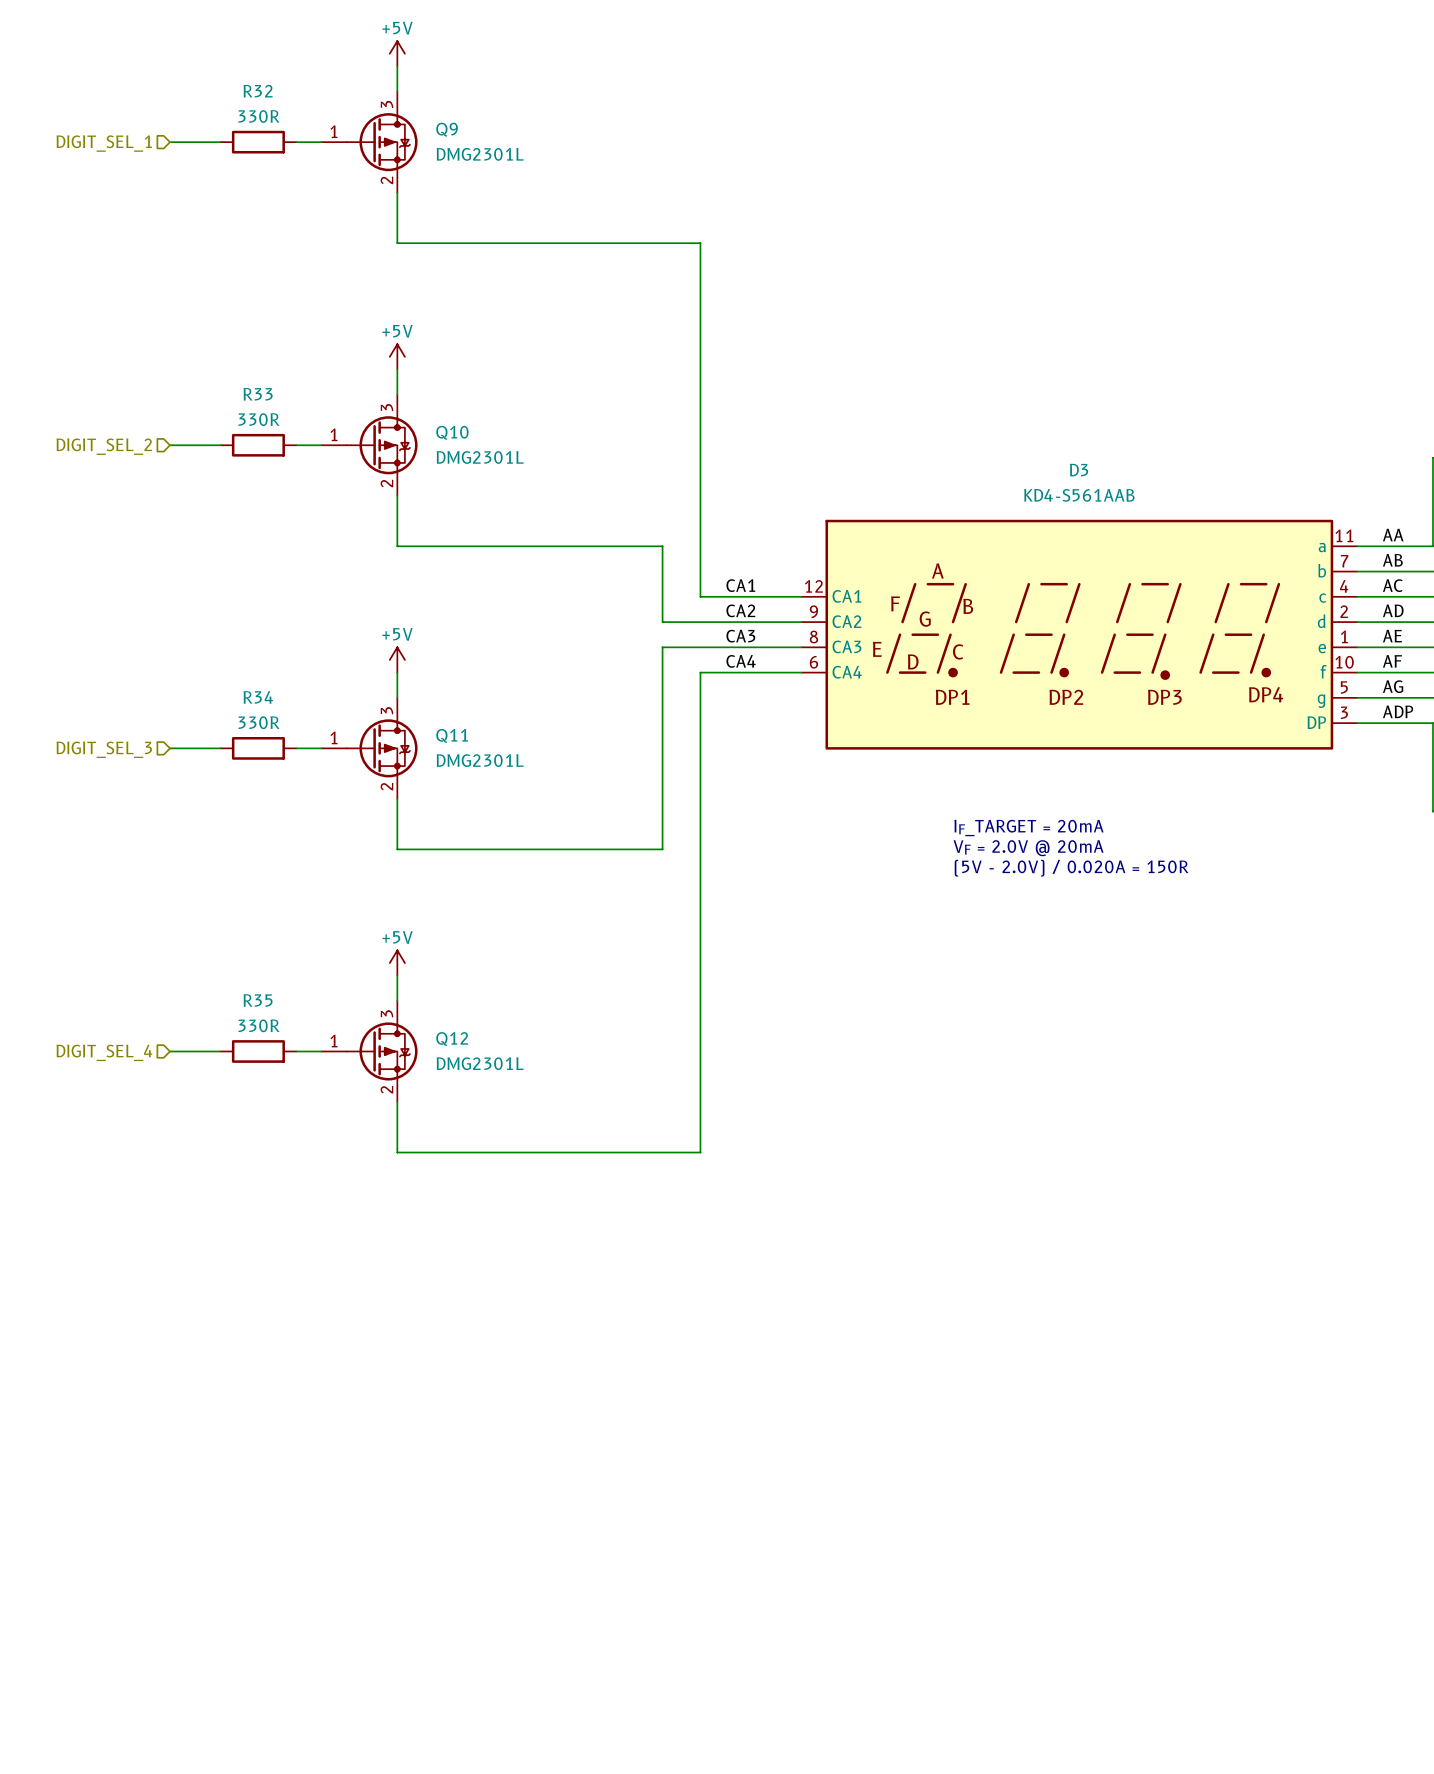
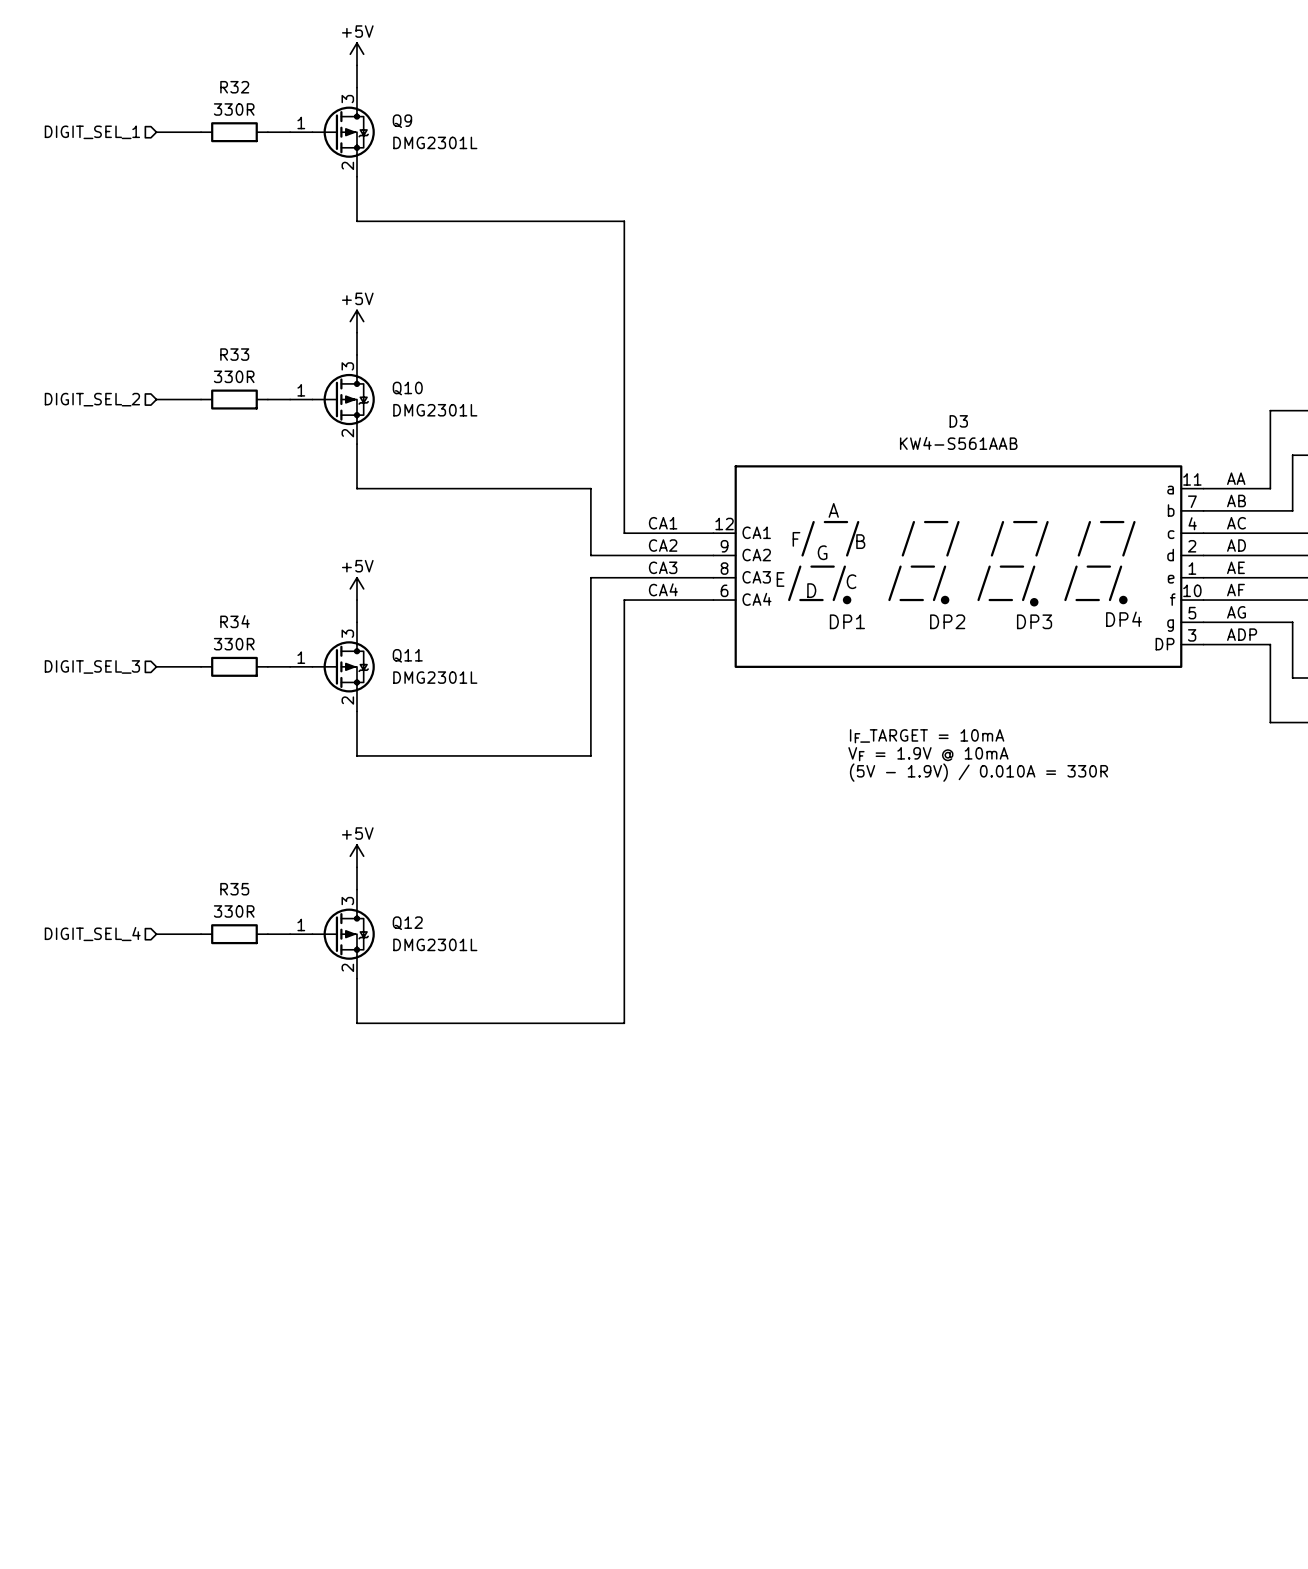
D3 value: KD4-S561AAB (1079, 495) -> KW4-S561AAB (958, 443)
text: IF_TARGET = 20mA (1028, 828) -> IF_TARGET = 10mA (927, 736)
text: VF = 2.0V @ 20mA (1028, 848) -> VF = 1.9V @ 10mA (928, 754)
text: (5V - 2.0V) / 0.020A = 150R (1071, 868) -> (5V - 1.9V) / 0.010A = 330R (978, 772)

